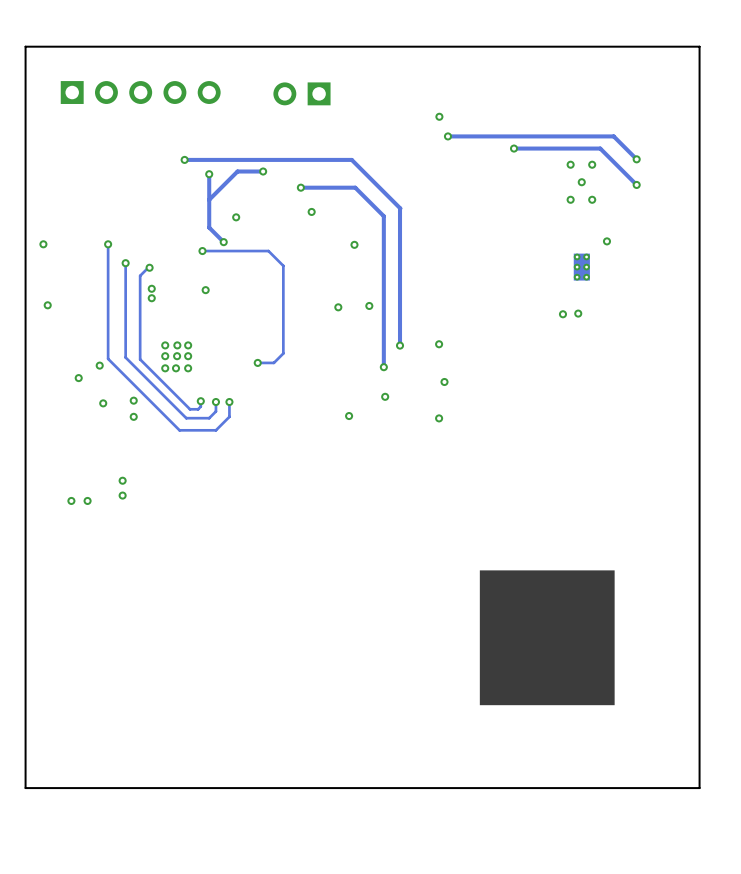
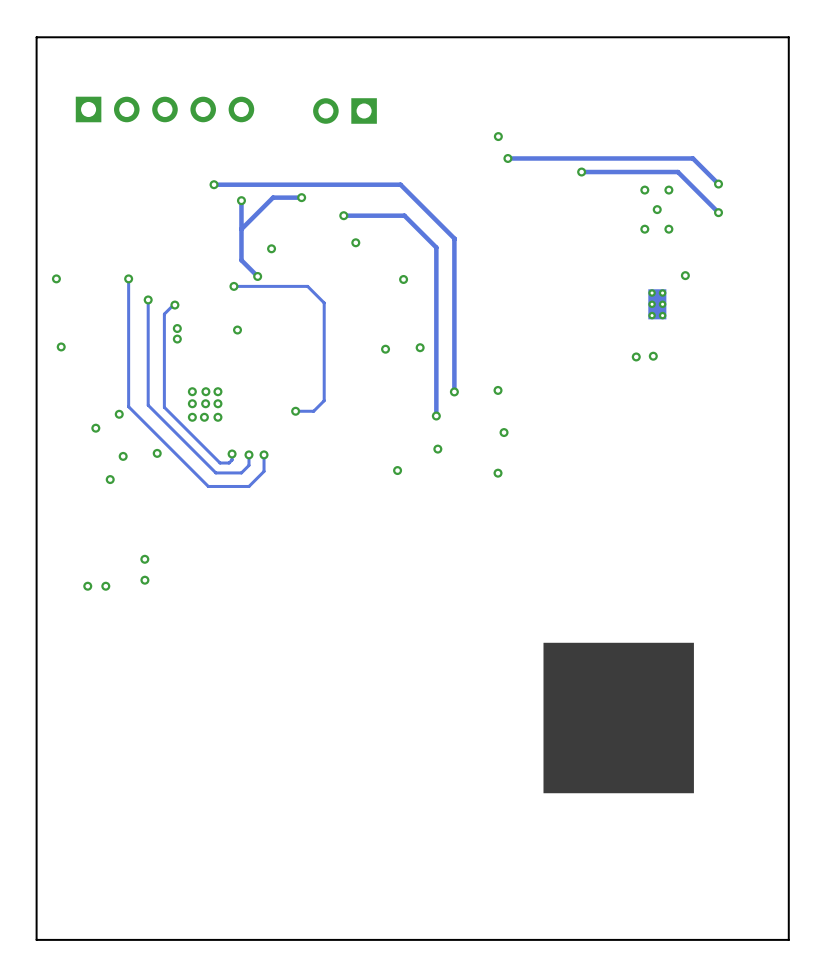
board edge: (699, 46) (25, 46) (25, 788) (699, 788) (699, 46) -> (788, 37) (788, 939) (36, 939) (36, 37) (788, 37)
via: (133, 416) -> none
via: none -> (110, 479)
via: (122, 480) -> none
via: (71, 500) -> none
via: (87, 500) -> none
via: none -> (144, 580)
via: none -> (87, 586)
via: none -> (105, 586)

